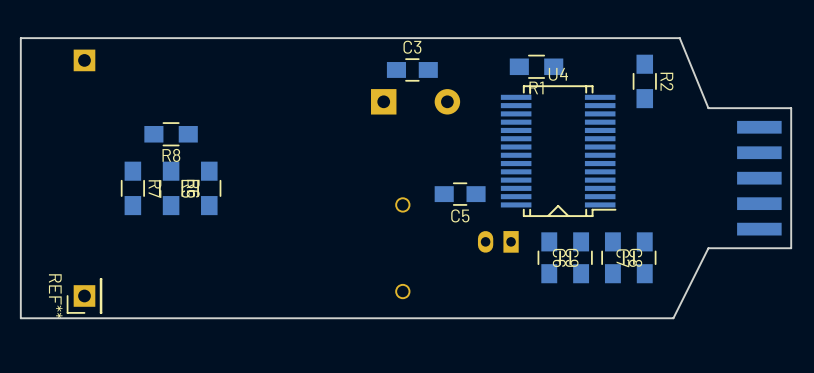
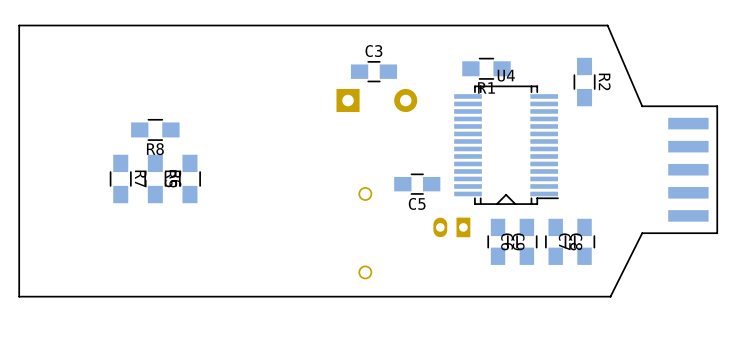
board edge: (20, 38) (679, 38) (708, 108) -> (19, 42) (19, 25) (607, 25) (642, 106)
part: (84, 60) -> none
REF**: (84, 295) -> none

